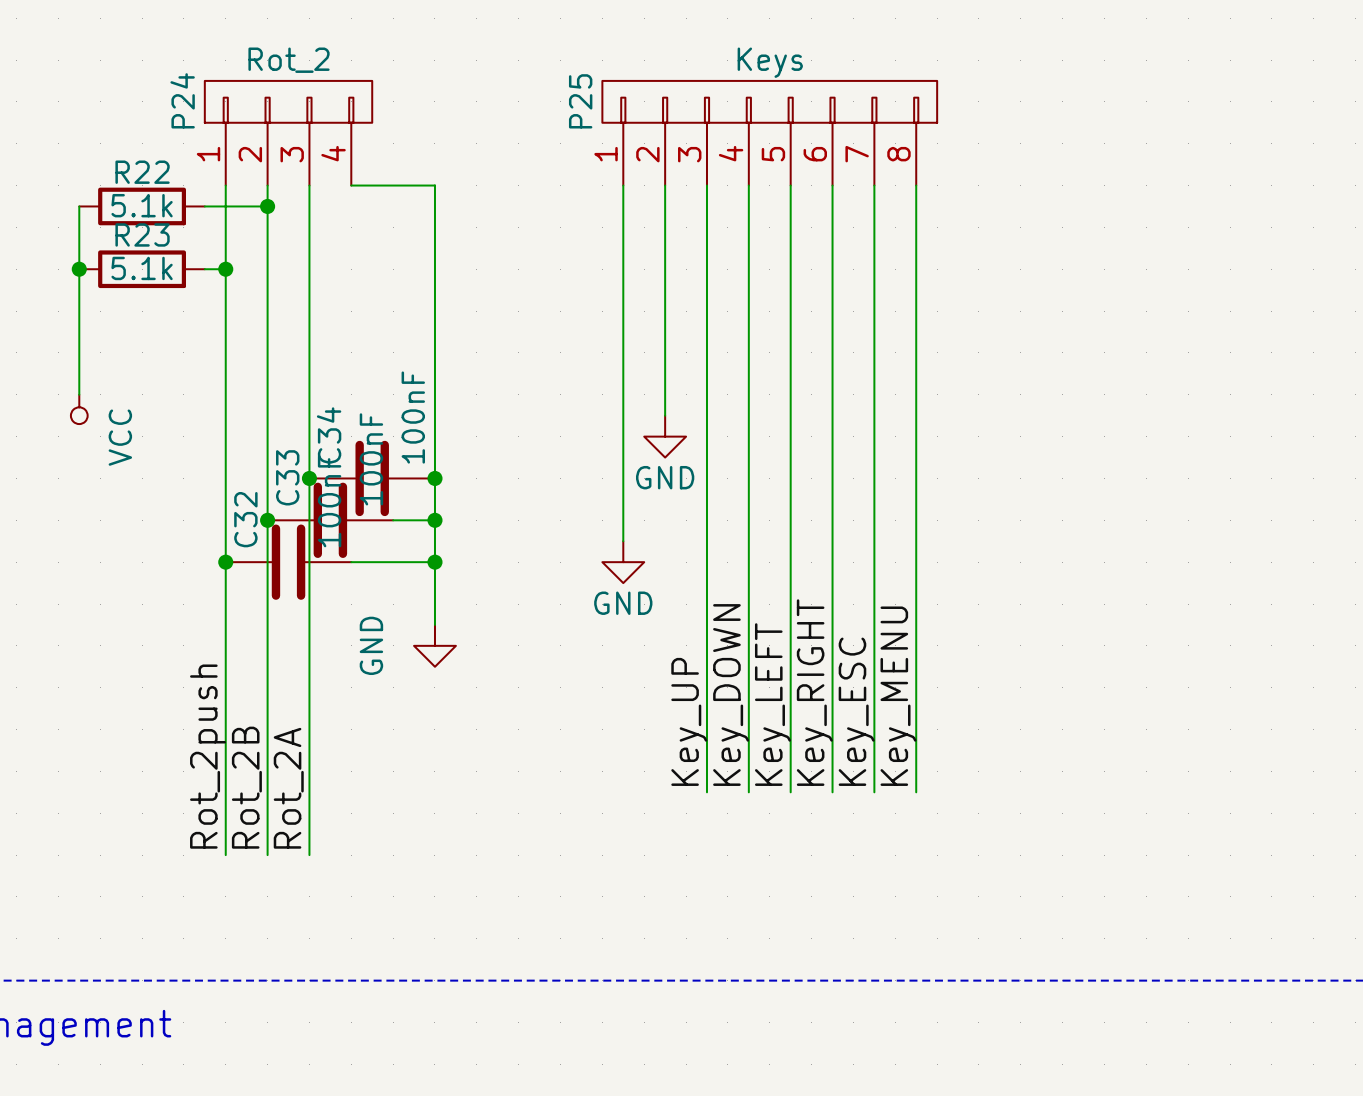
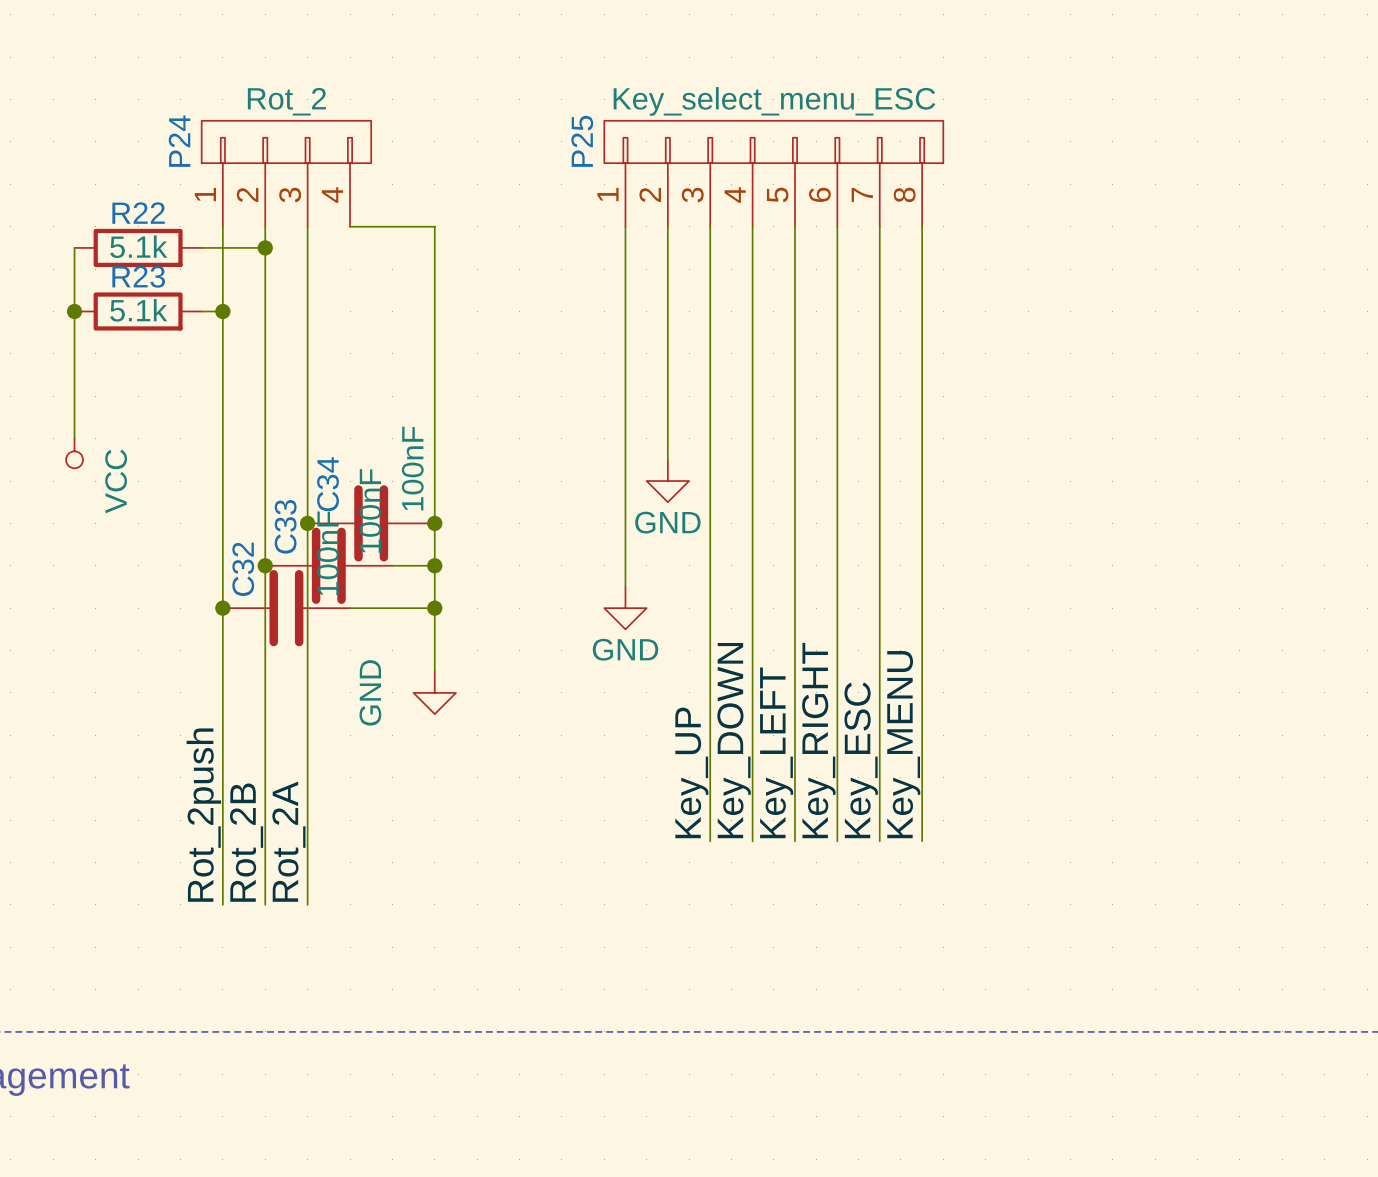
P25 value: Keys (770, 62) -> Key_select_menu_ESC (774, 101)

